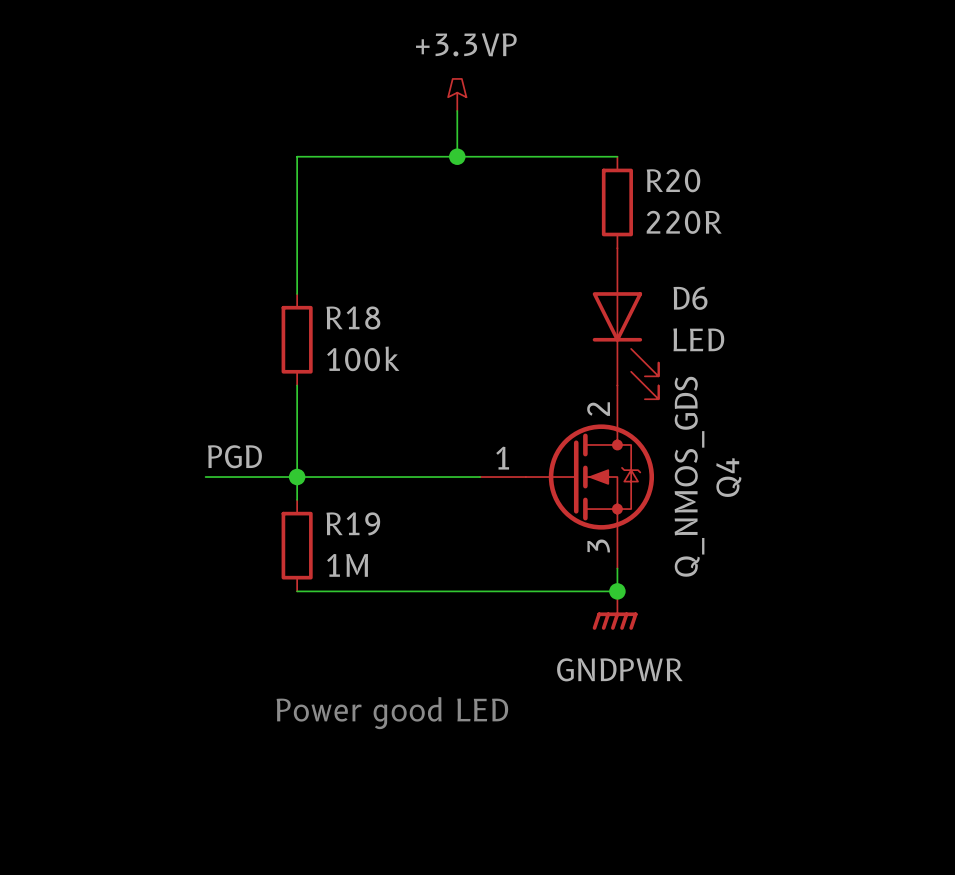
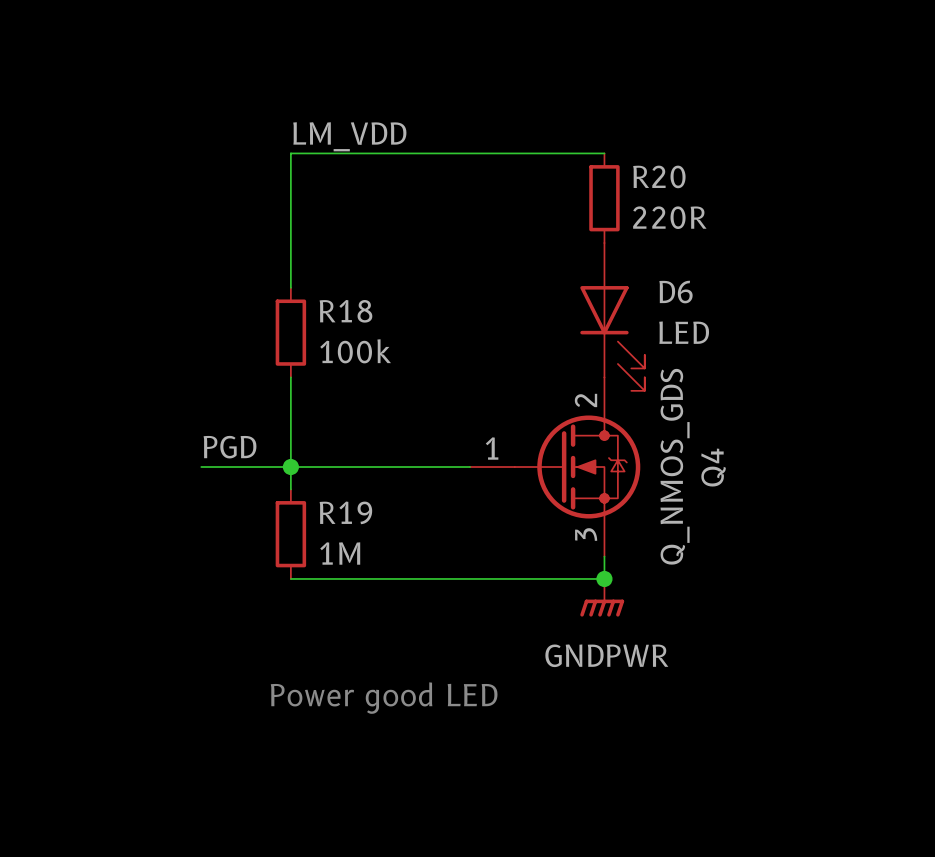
power symbol: +3.3VP (457, 94) -> none
wire: (457, 110) (457, 156) -> none
label: none -> LM_VDD (349, 136)
junction: (457, 156) -> none

